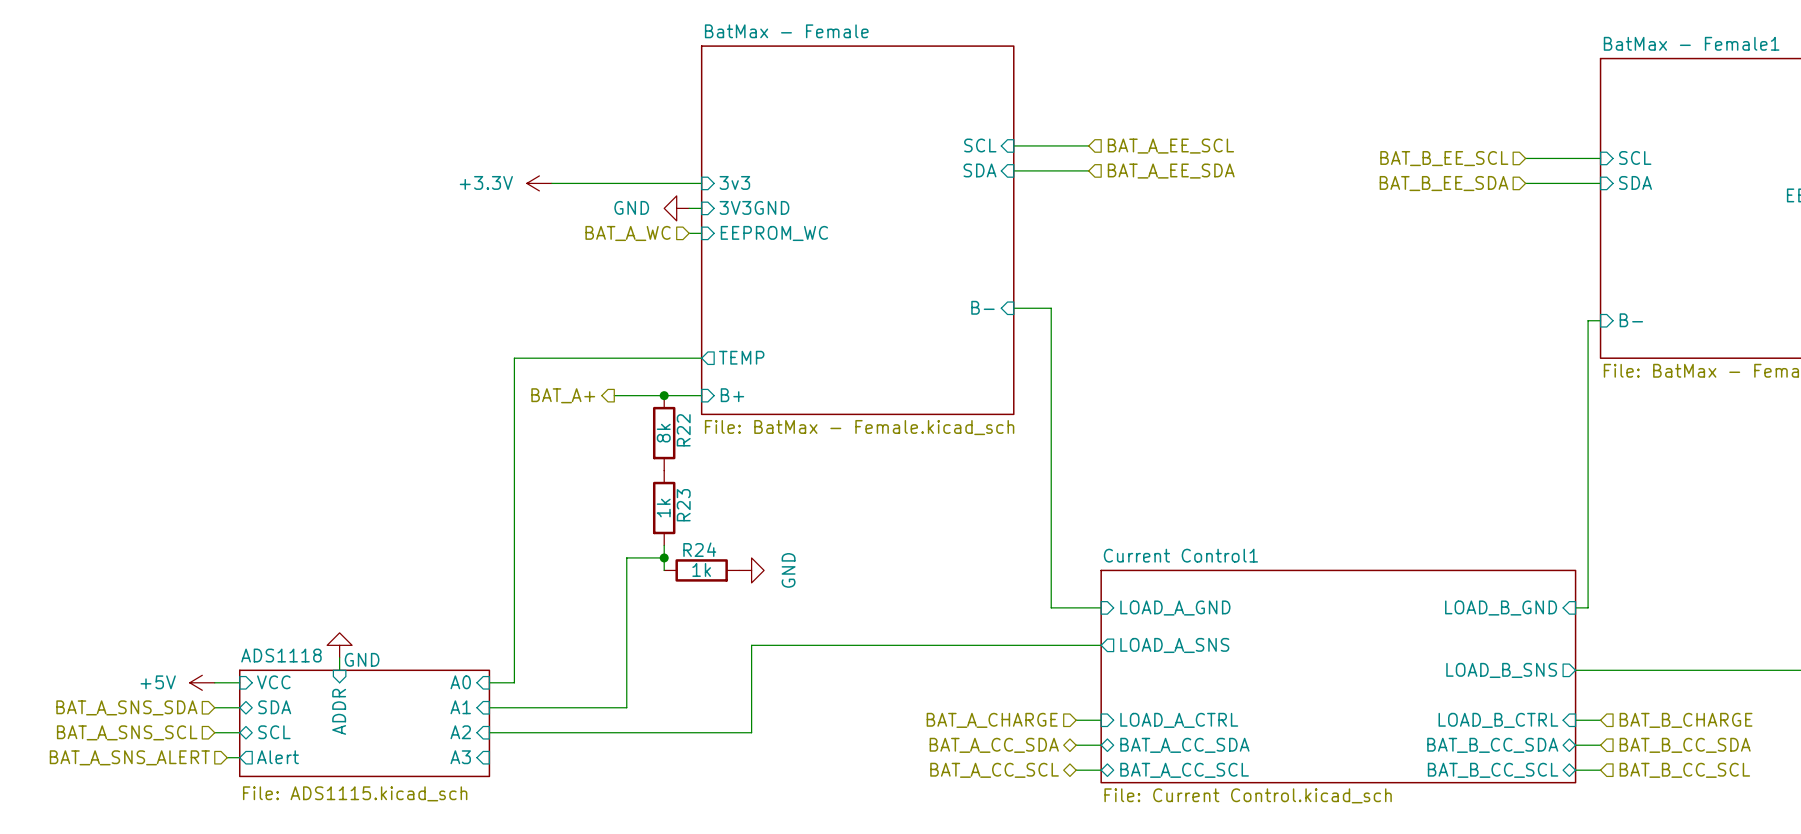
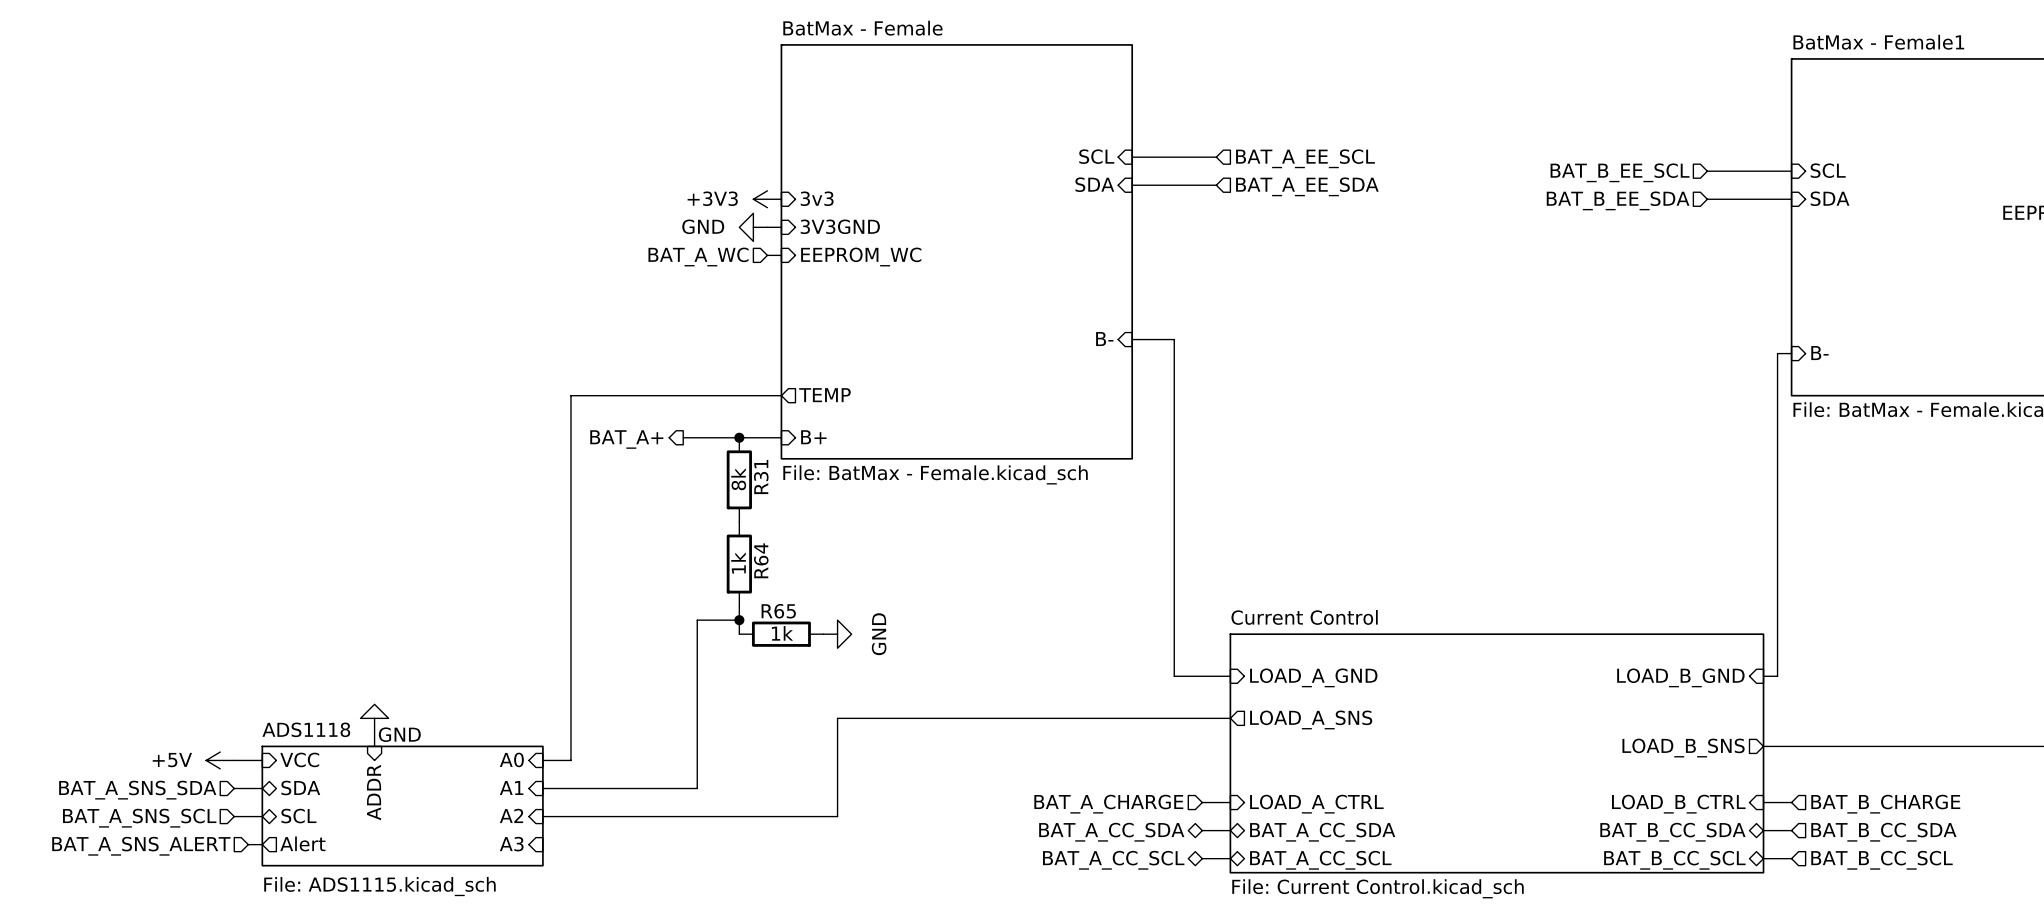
power symbol: +3.3V (539, 183) -> none
wire: (551, 183) (701, 183) -> none
power symbol: none -> +3V3 (767, 199)
R22 name: R22 (683, 430) -> R31 (761, 476)
R23 name: R23 (683, 505) -> R64 (761, 560)
R24 name: R24 (699, 549) -> R65 (778, 611)
sheet Current Control1 name: Current Control1 (1180, 555) -> Current Control (1304, 617)

